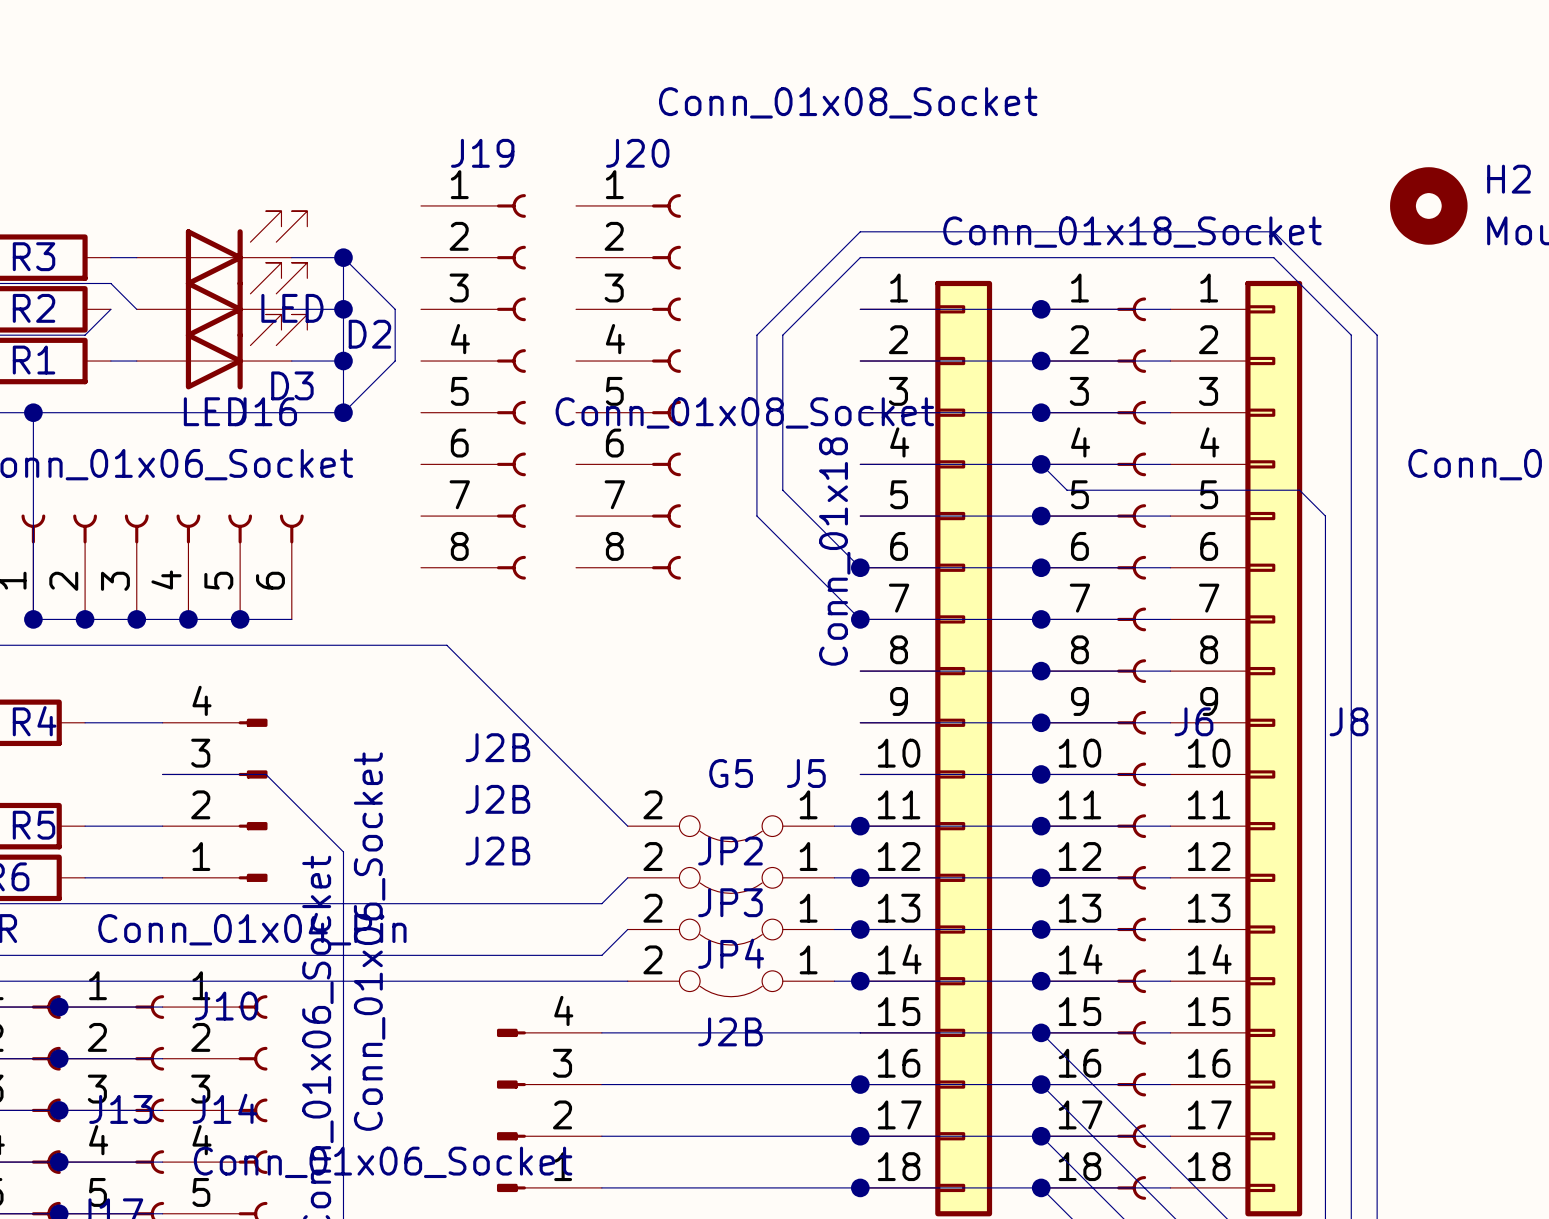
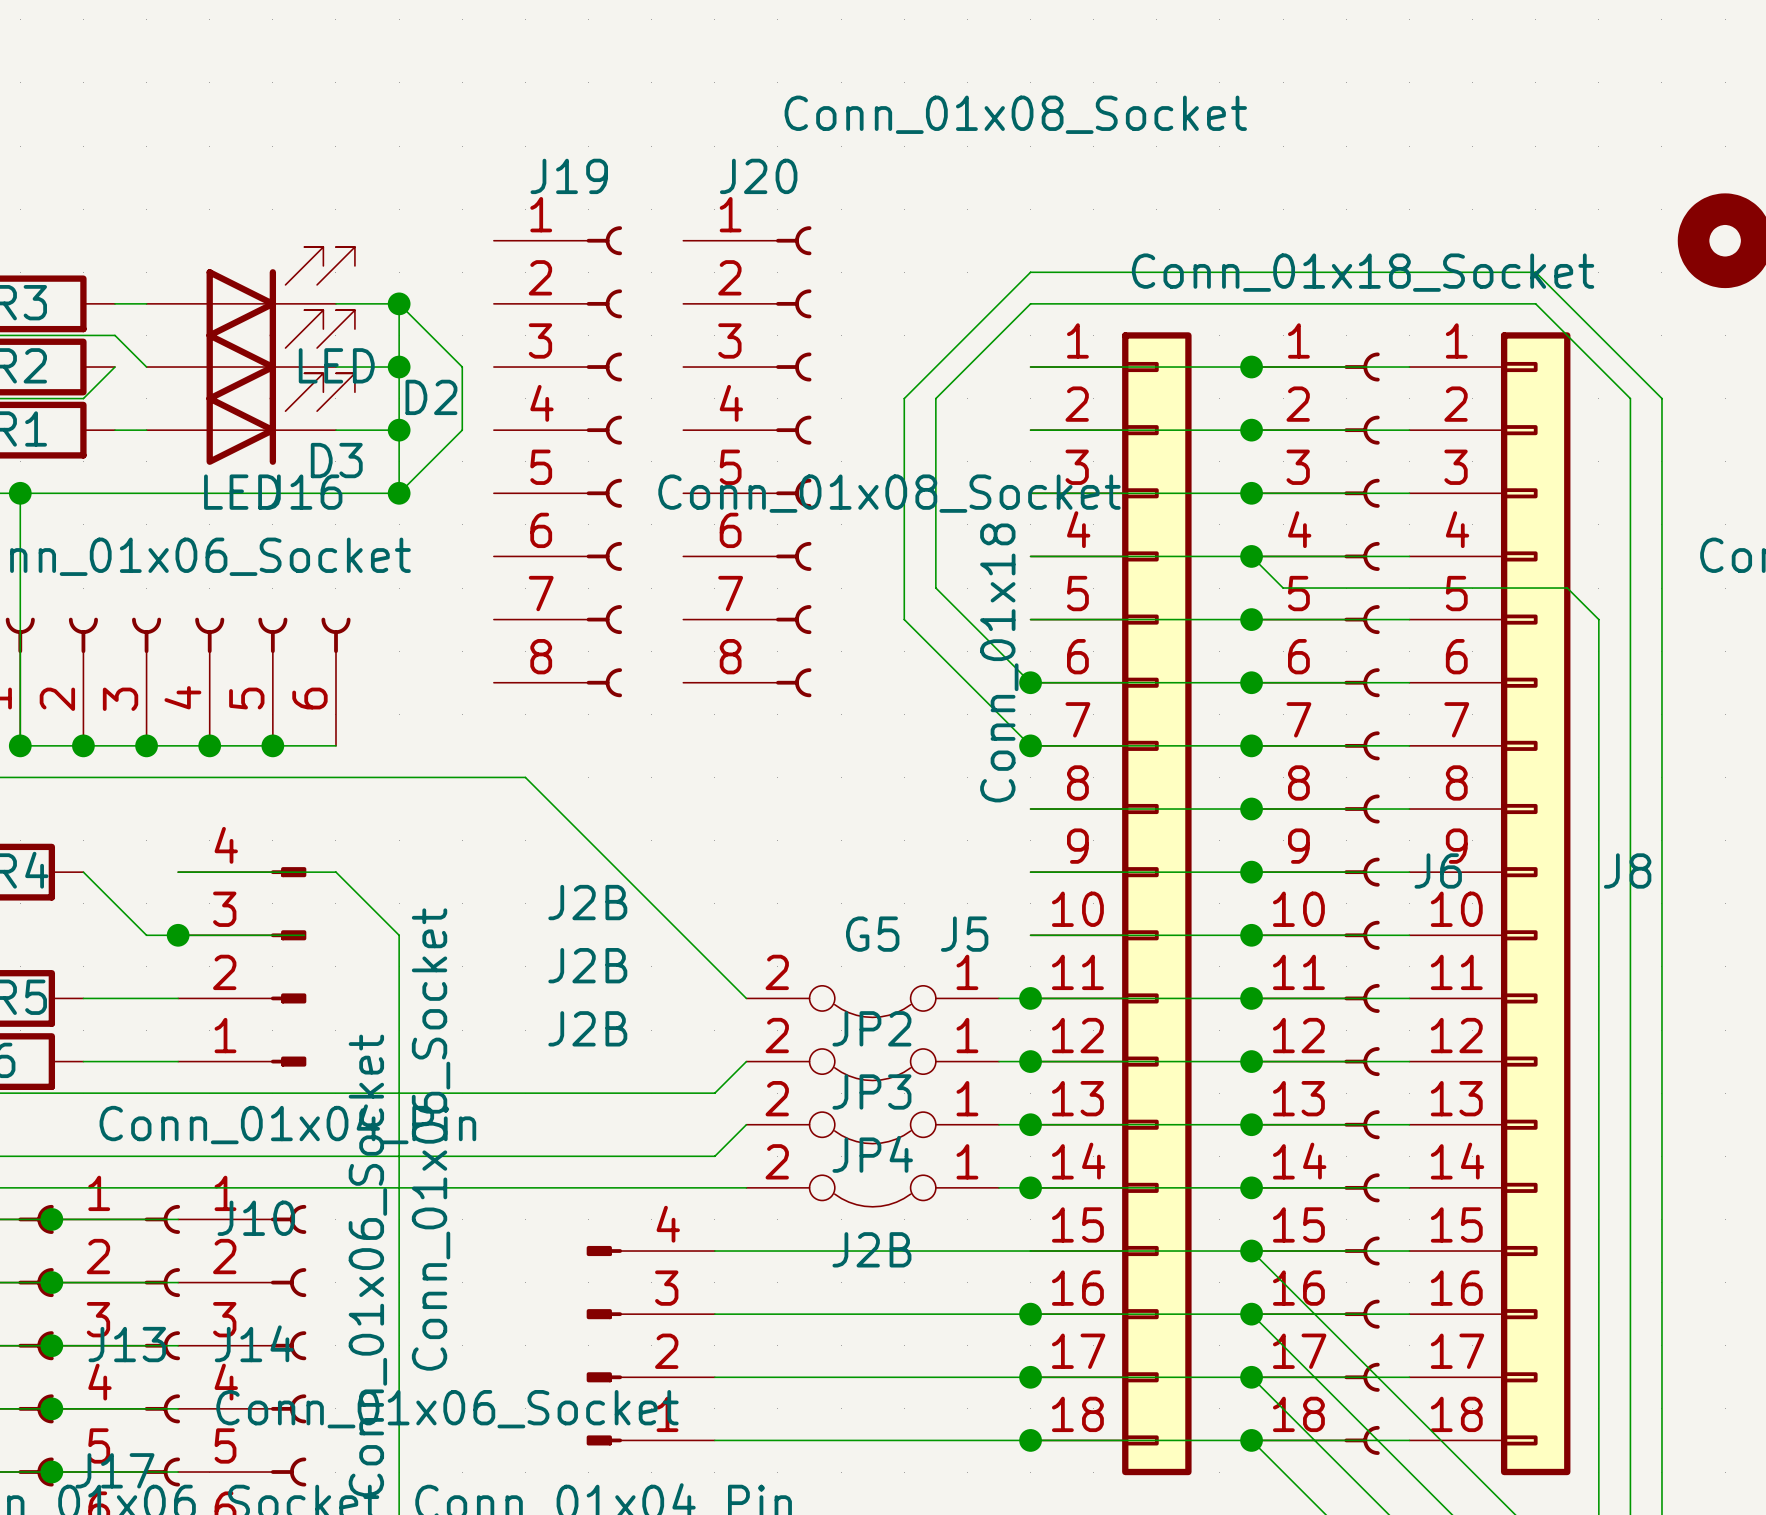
wire: (85, 722) (162, 722) -> (83, 872) (146, 935) (178, 935)
junction: none -> (178, 935)
wire: (265, 774) (343, 851) -> (178, 872) (335, 872) (399, 935) (399, 1030)

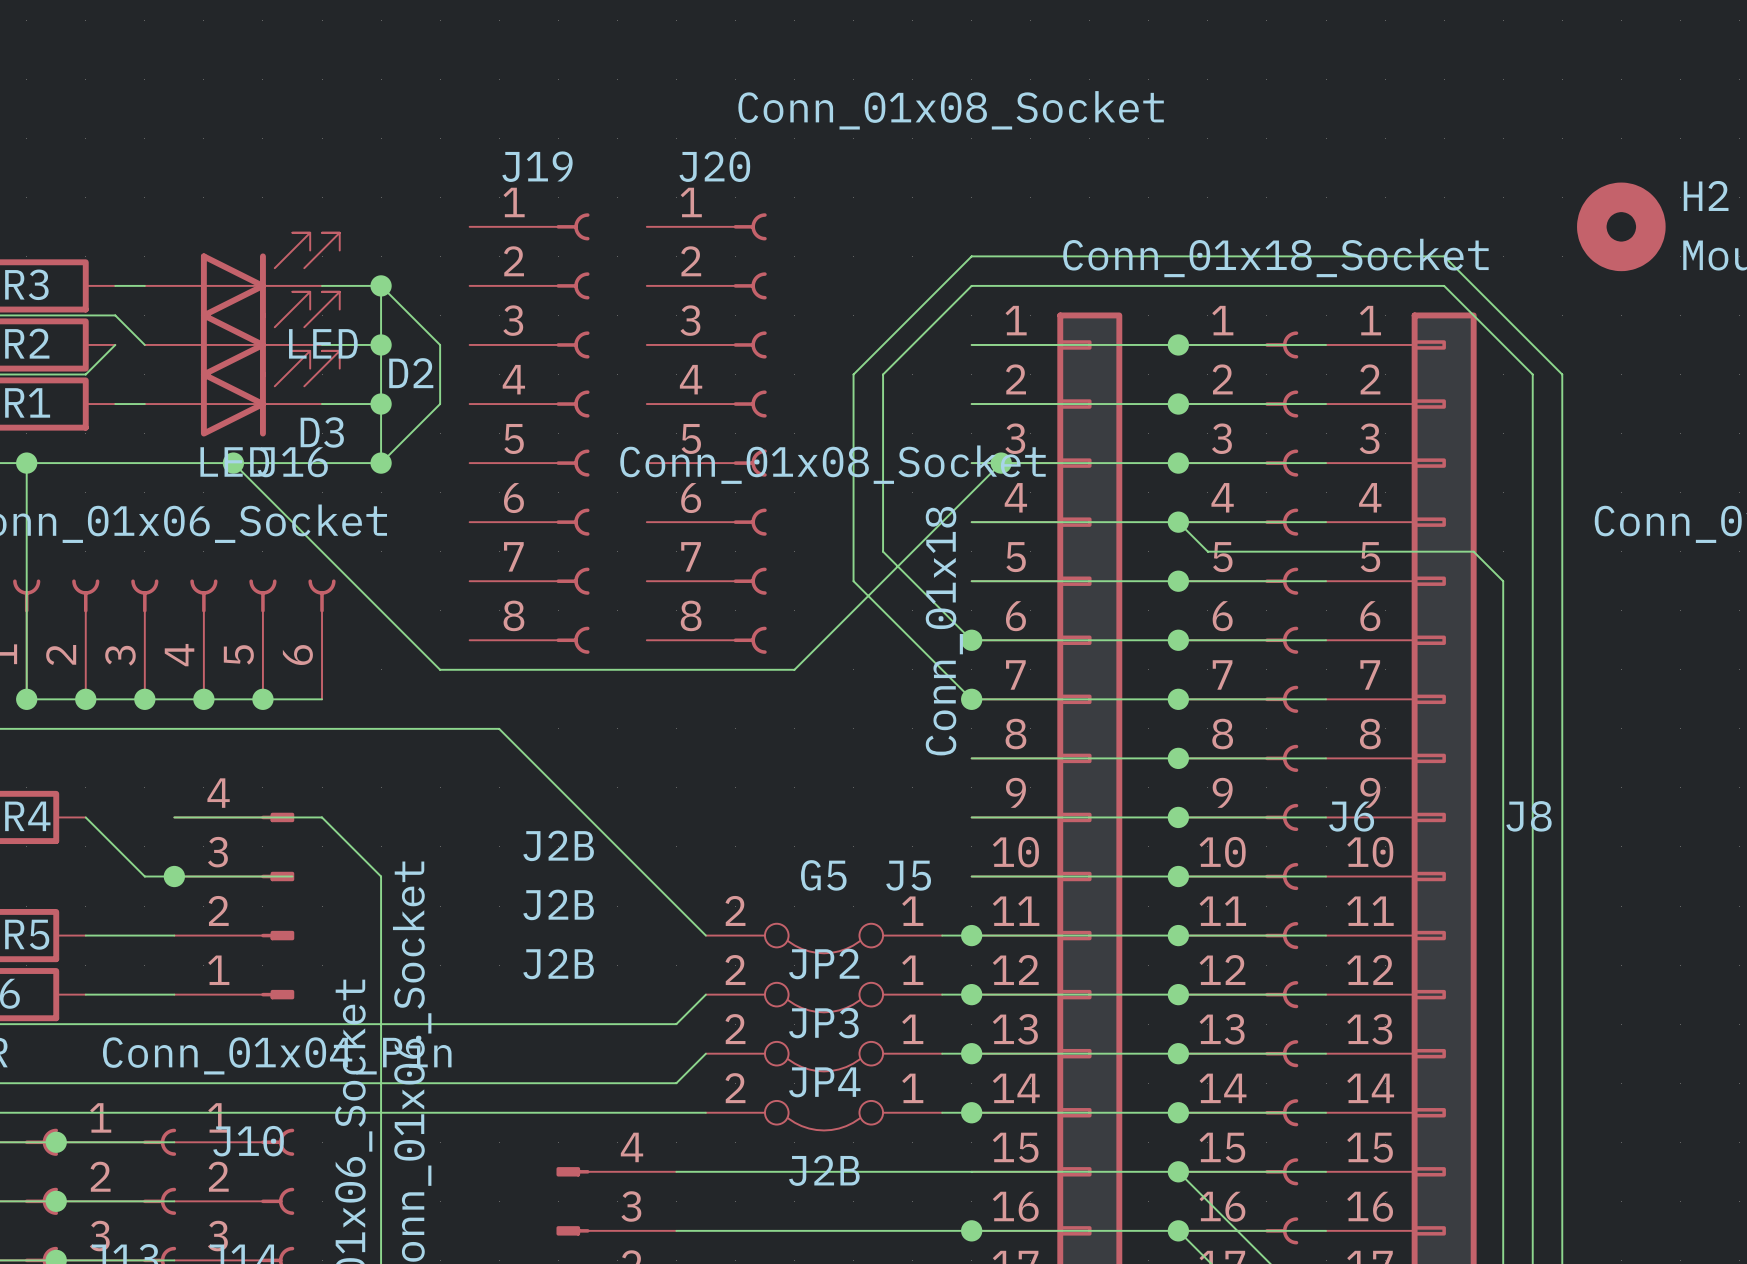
wire: none -> (233, 463) (440, 669) (794, 669) (1001, 463)
junction: none -> (233, 463)
junction: none -> (1001, 463)

